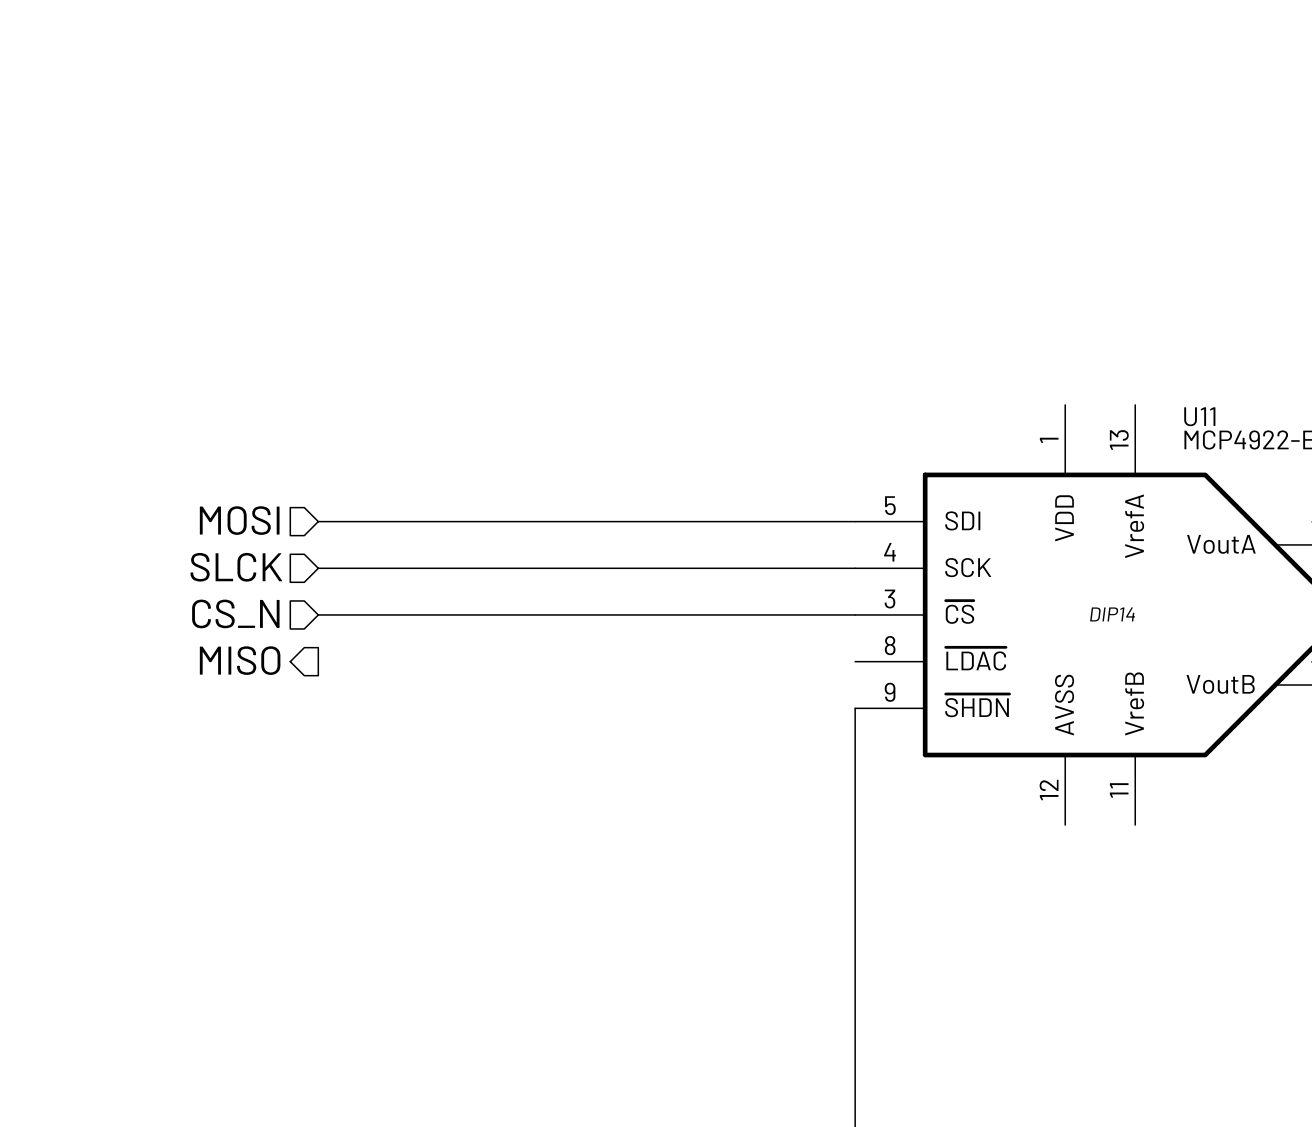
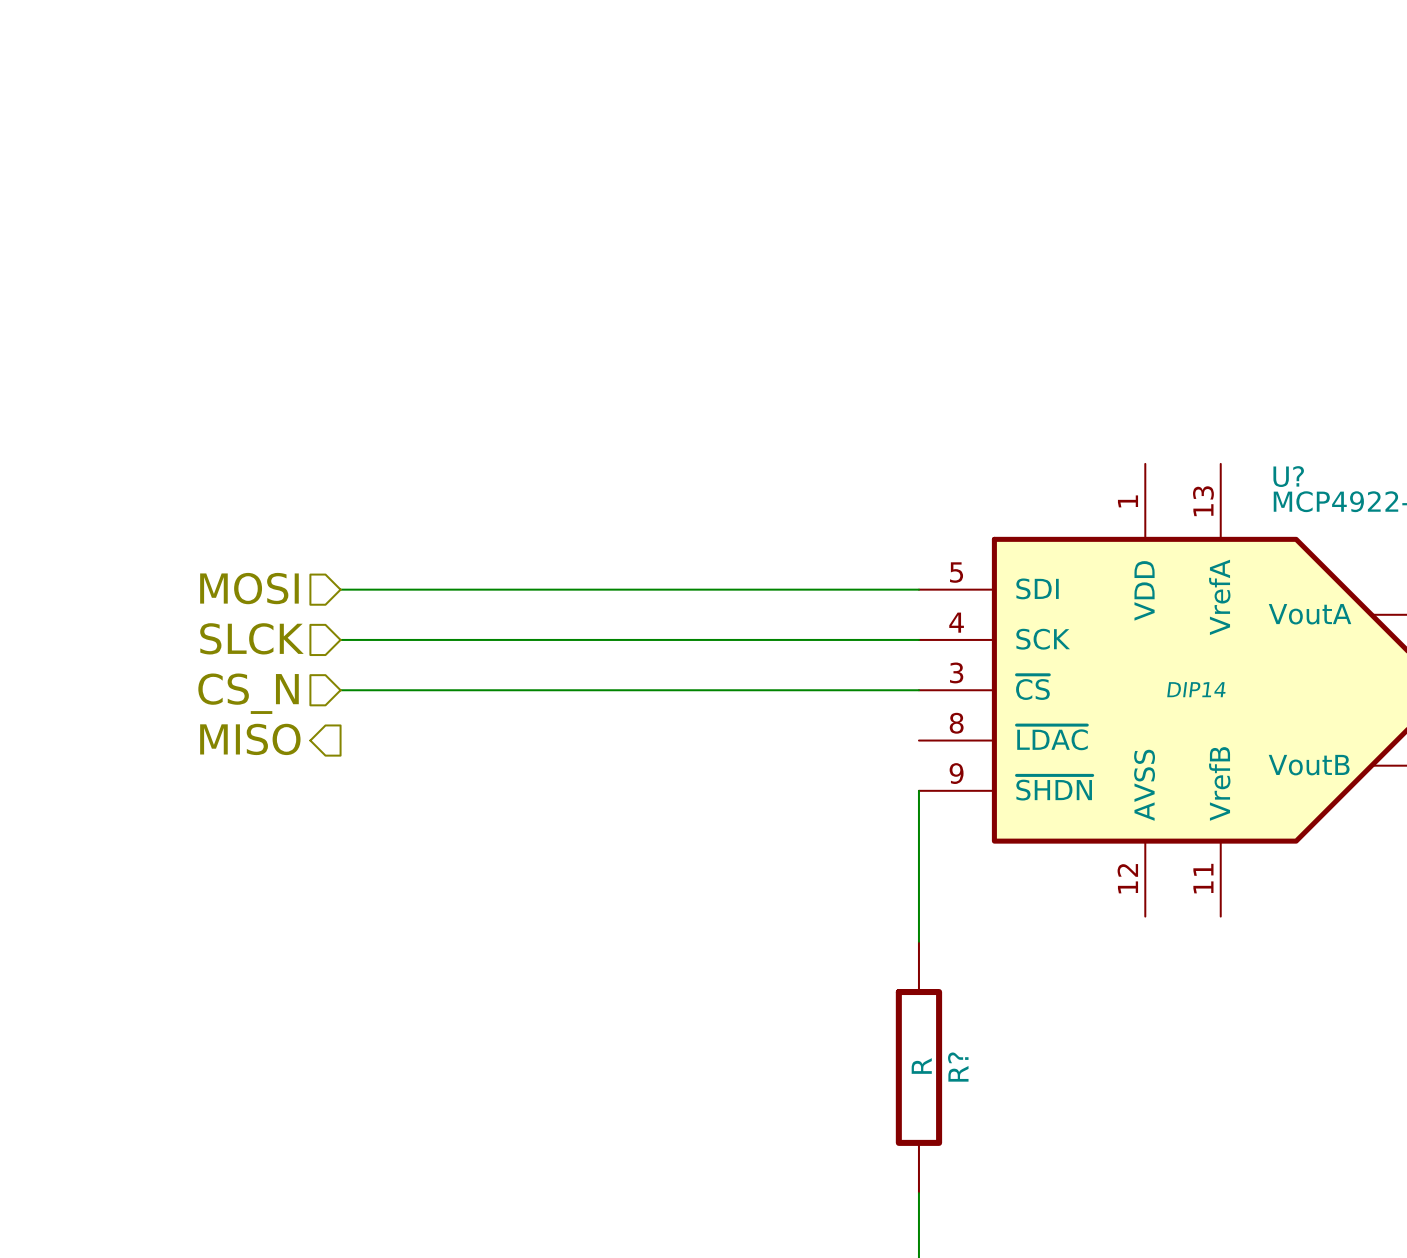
U11 name: U11 (1199, 416) -> U? (1288, 476)
wire: (855, 848) (855, 1081) -> none
R?: none -> R (918, 1067)

